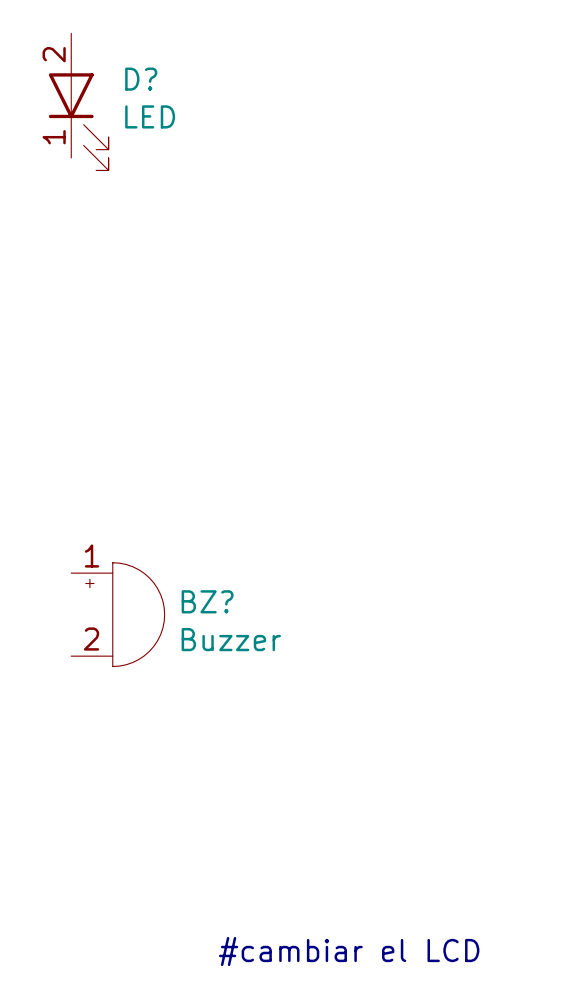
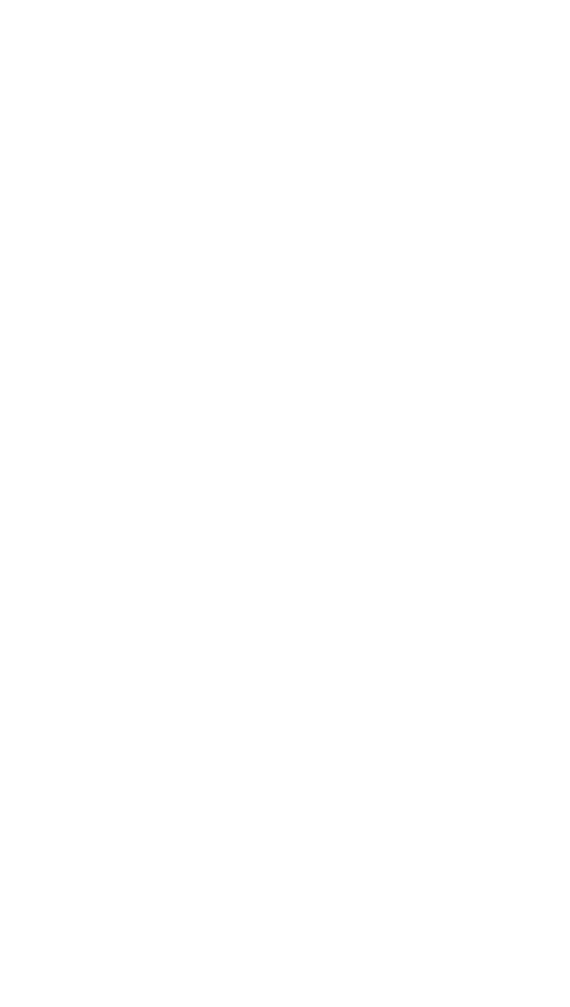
D?: LED (78, 101) -> none
BZ?: Buzzer (117, 614) -> none
text: #cambiar el LCD (349, 951) -> none

